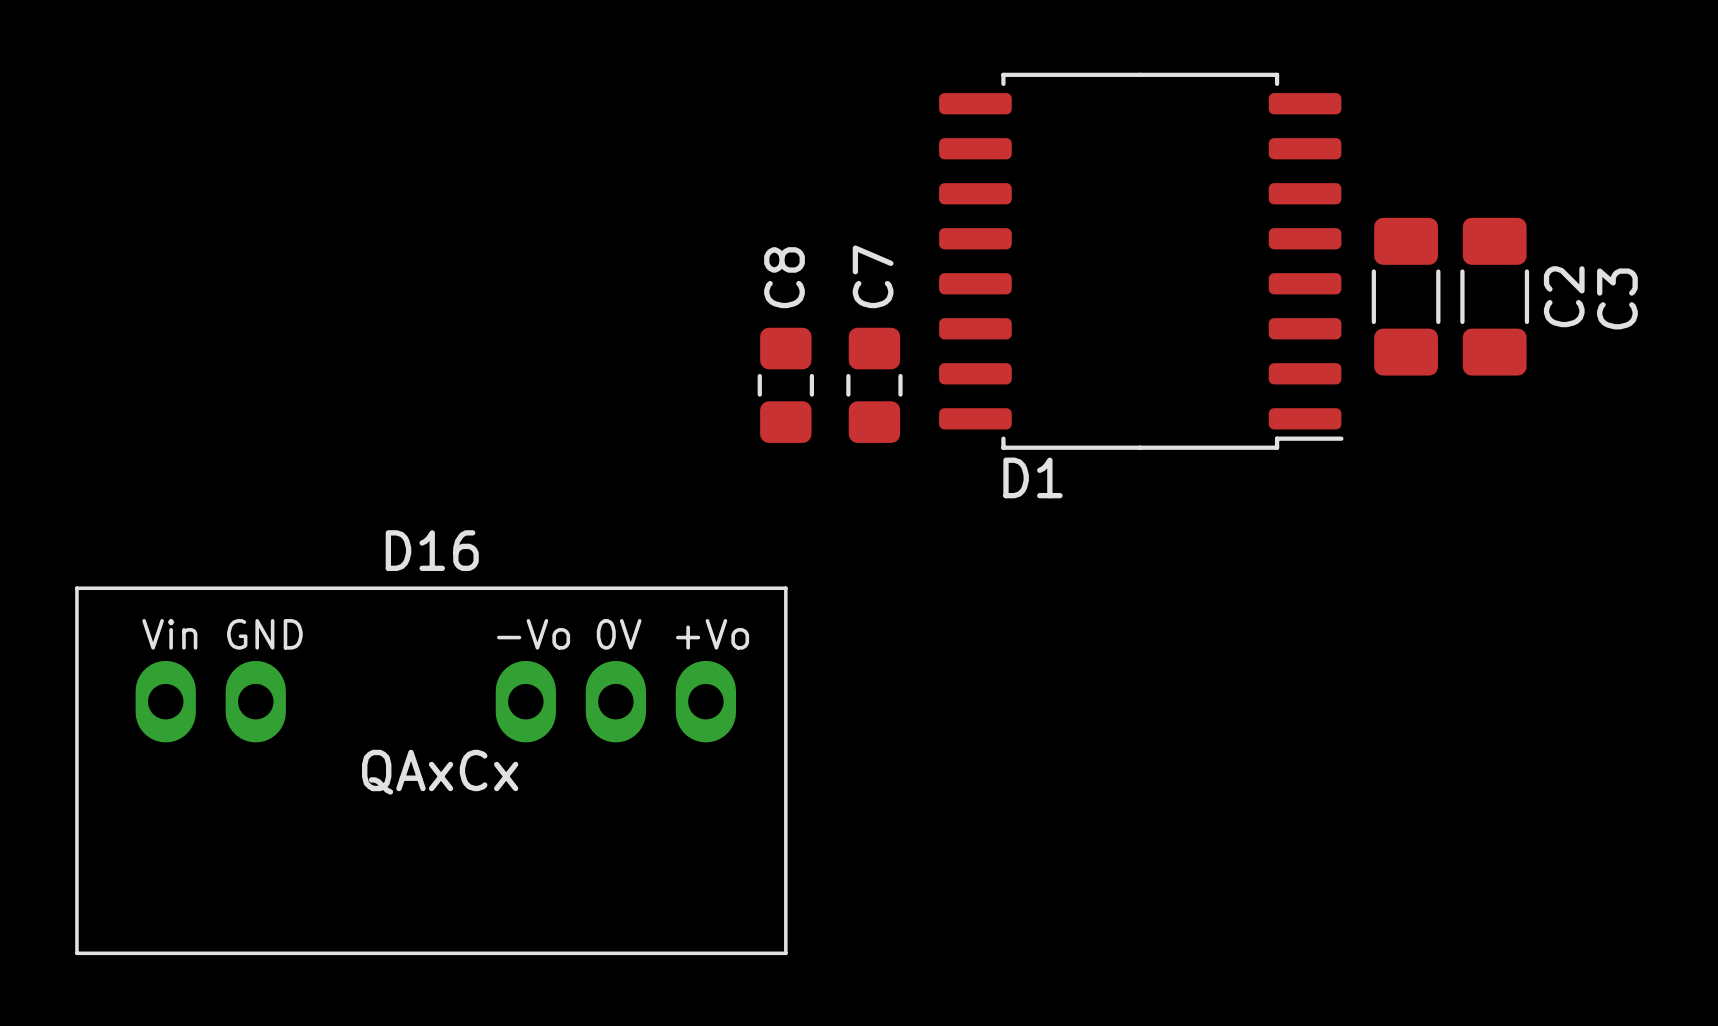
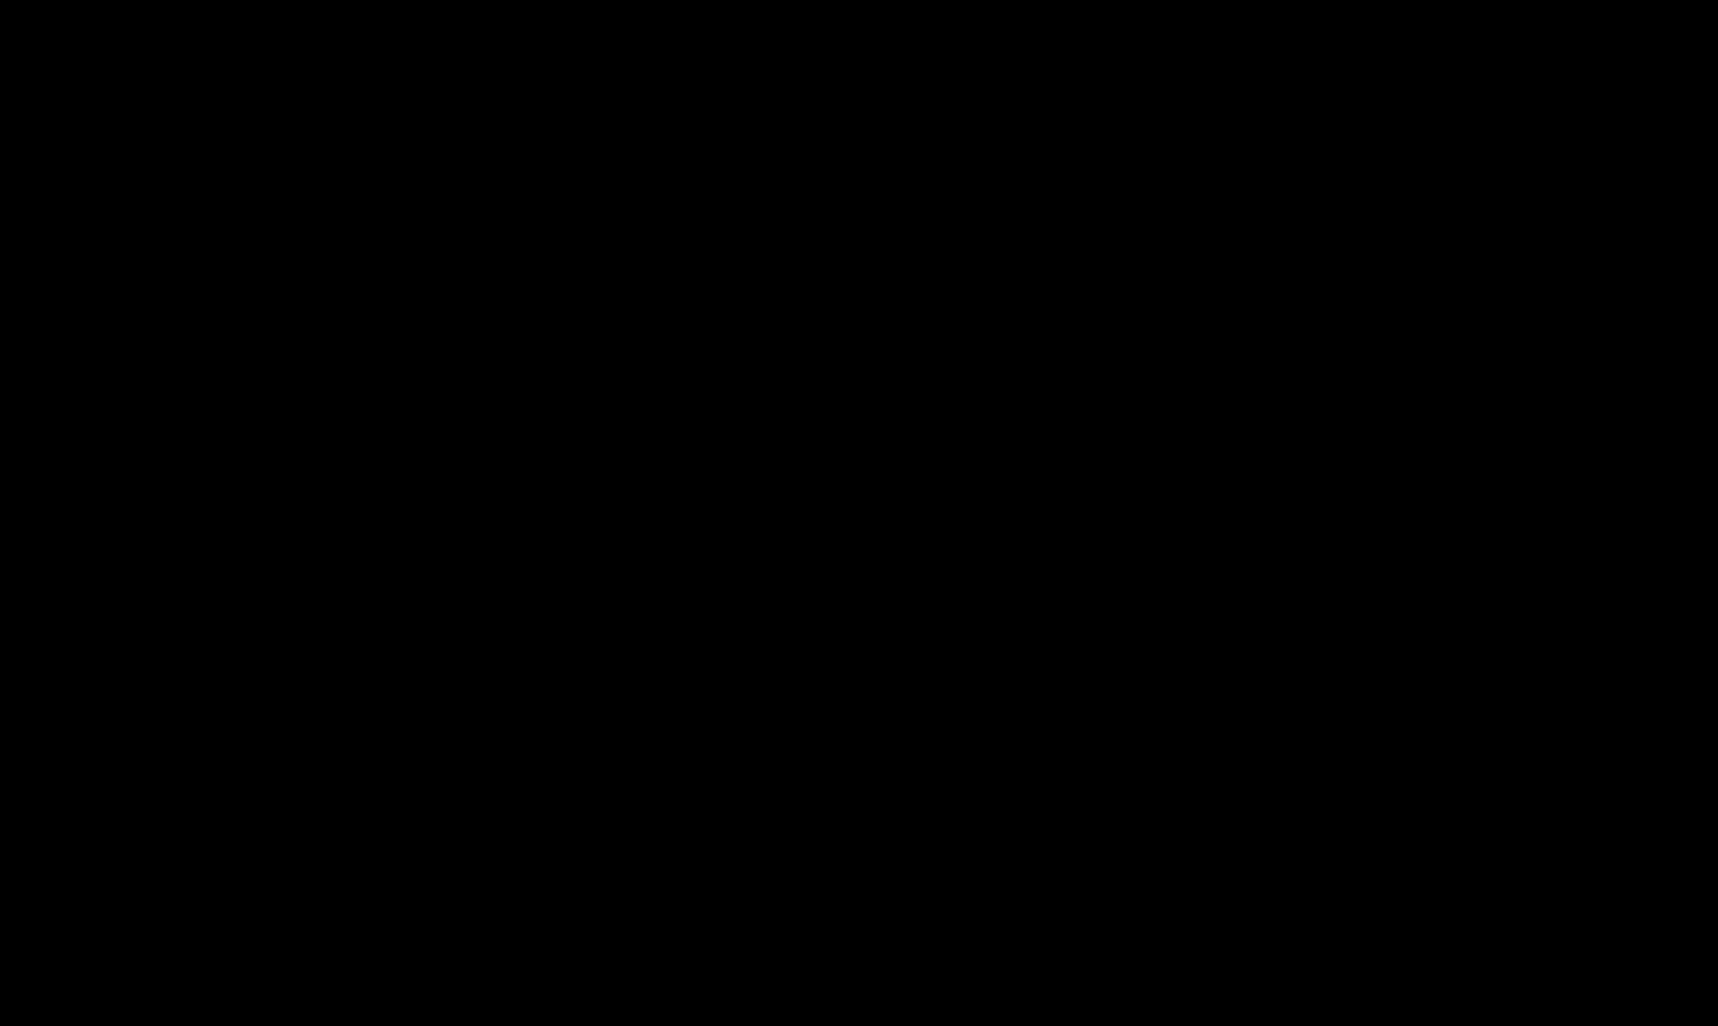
D1: (1141, 261) -> none
C2: (1406, 296) -> none
C3: (1494, 296) -> none
C8: (785, 385) -> none
C7: (874, 385) -> none
D16: (431, 770) -> none

